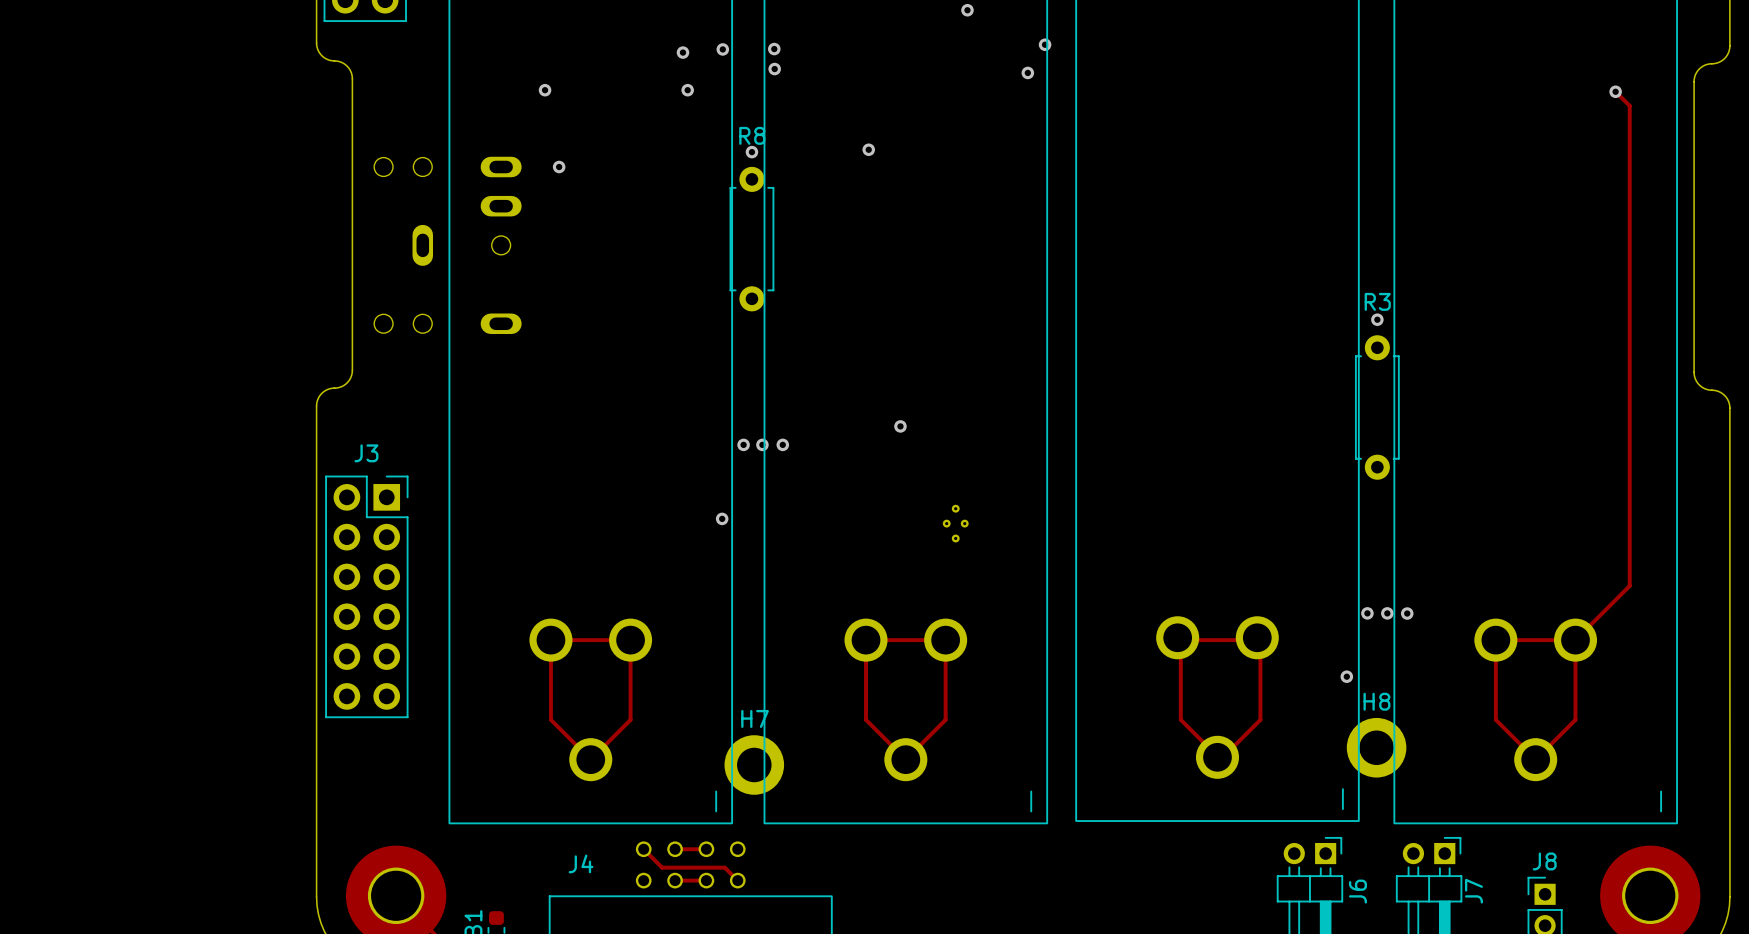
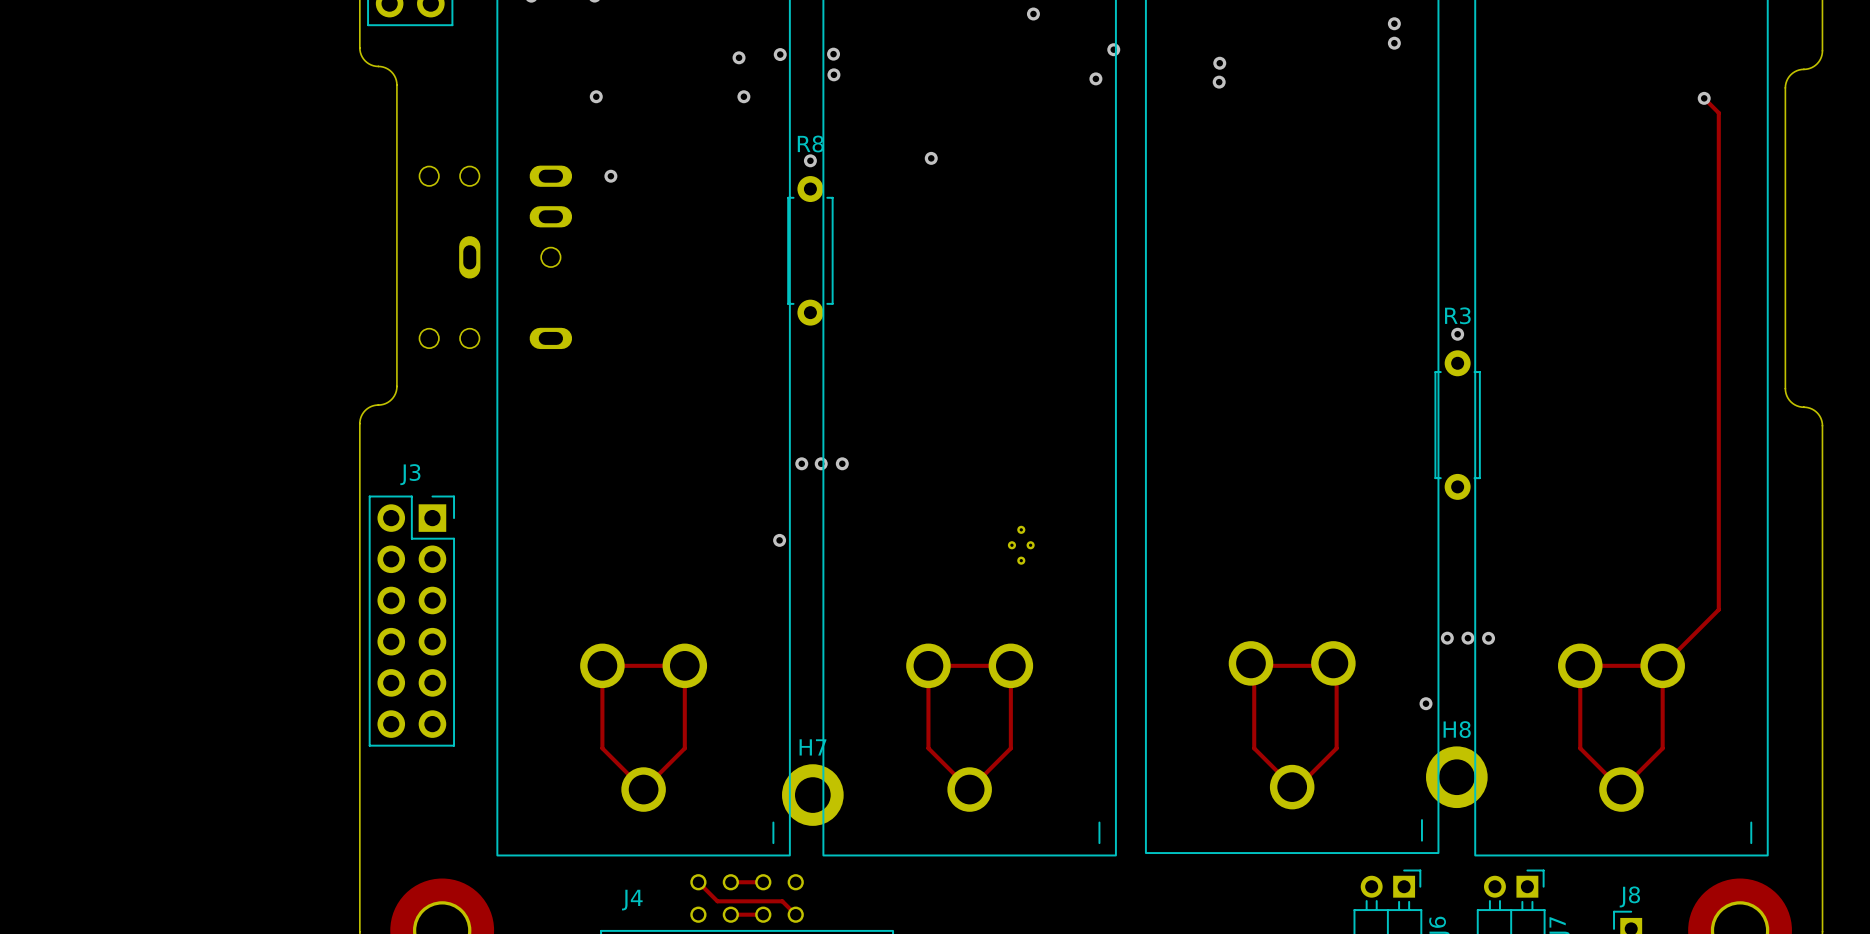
via: none -> (1394, 23)
via: none -> (1394, 43)
via: none -> (1219, 63)
via: none -> (1219, 82)
via: (900, 426) -> none

